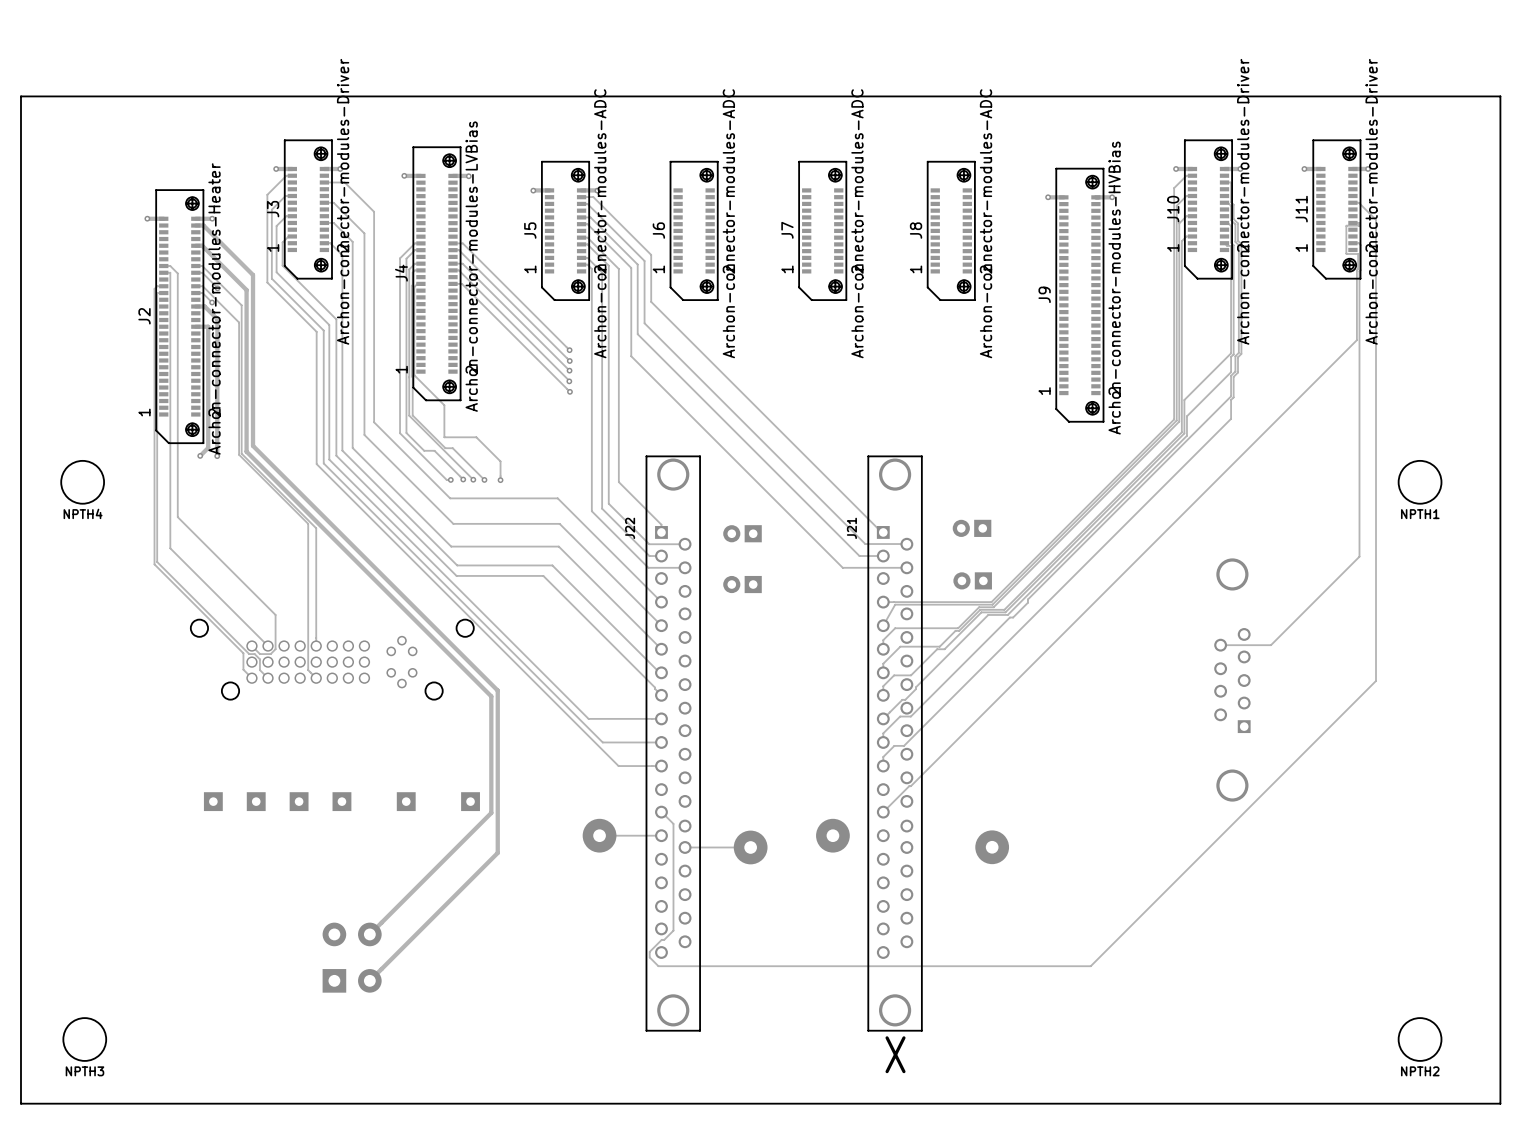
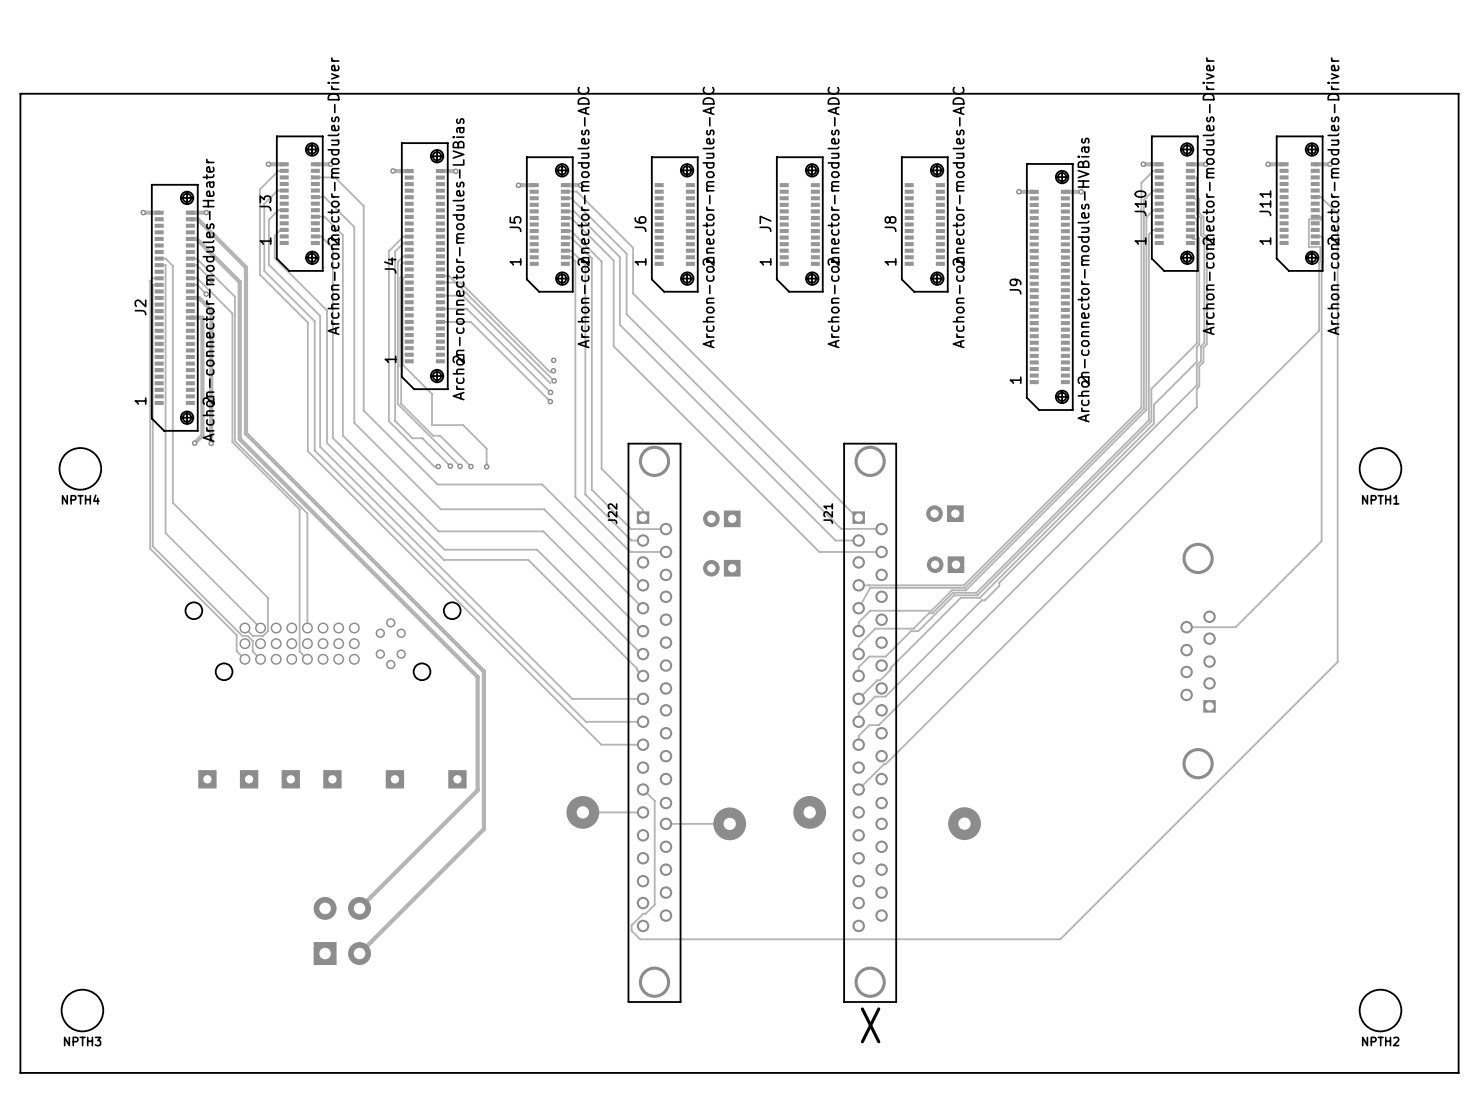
track: (452, 243) (462, 243) (569, 350) -> none
track: (452, 250) (458, 250) (569, 361) -> none
track: (452, 263) (462, 263) (569, 370) -> none
track: (452, 270) (458, 270) (569, 381) -> none
track: none -> (440, 282) (460, 282) (550, 372)
track: none -> (440, 295) (462, 295) (550, 383)
track: none -> (440, 308) (466, 308) (550, 392)
track: none -> (440, 321) (470, 321) (550, 401)
via: (569, 350) -> none
via: (569, 361) -> none
via: none -> (550, 392)
via: none -> (550, 401)

